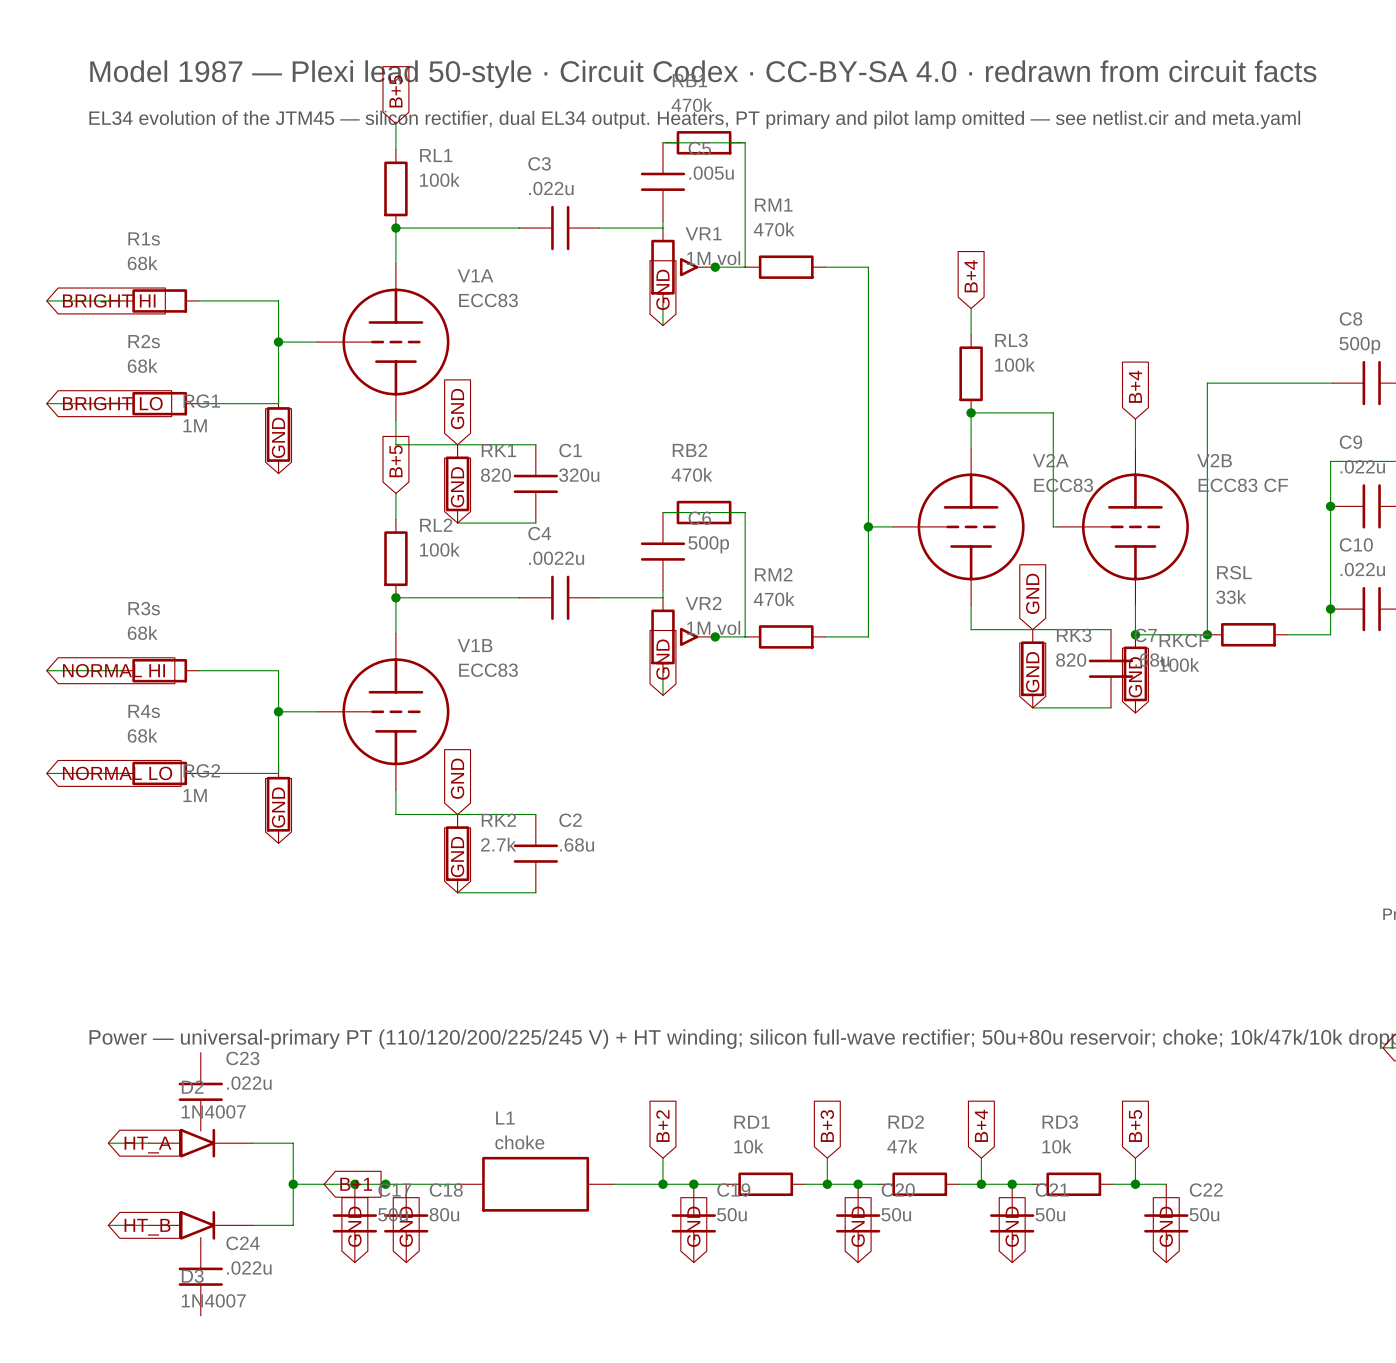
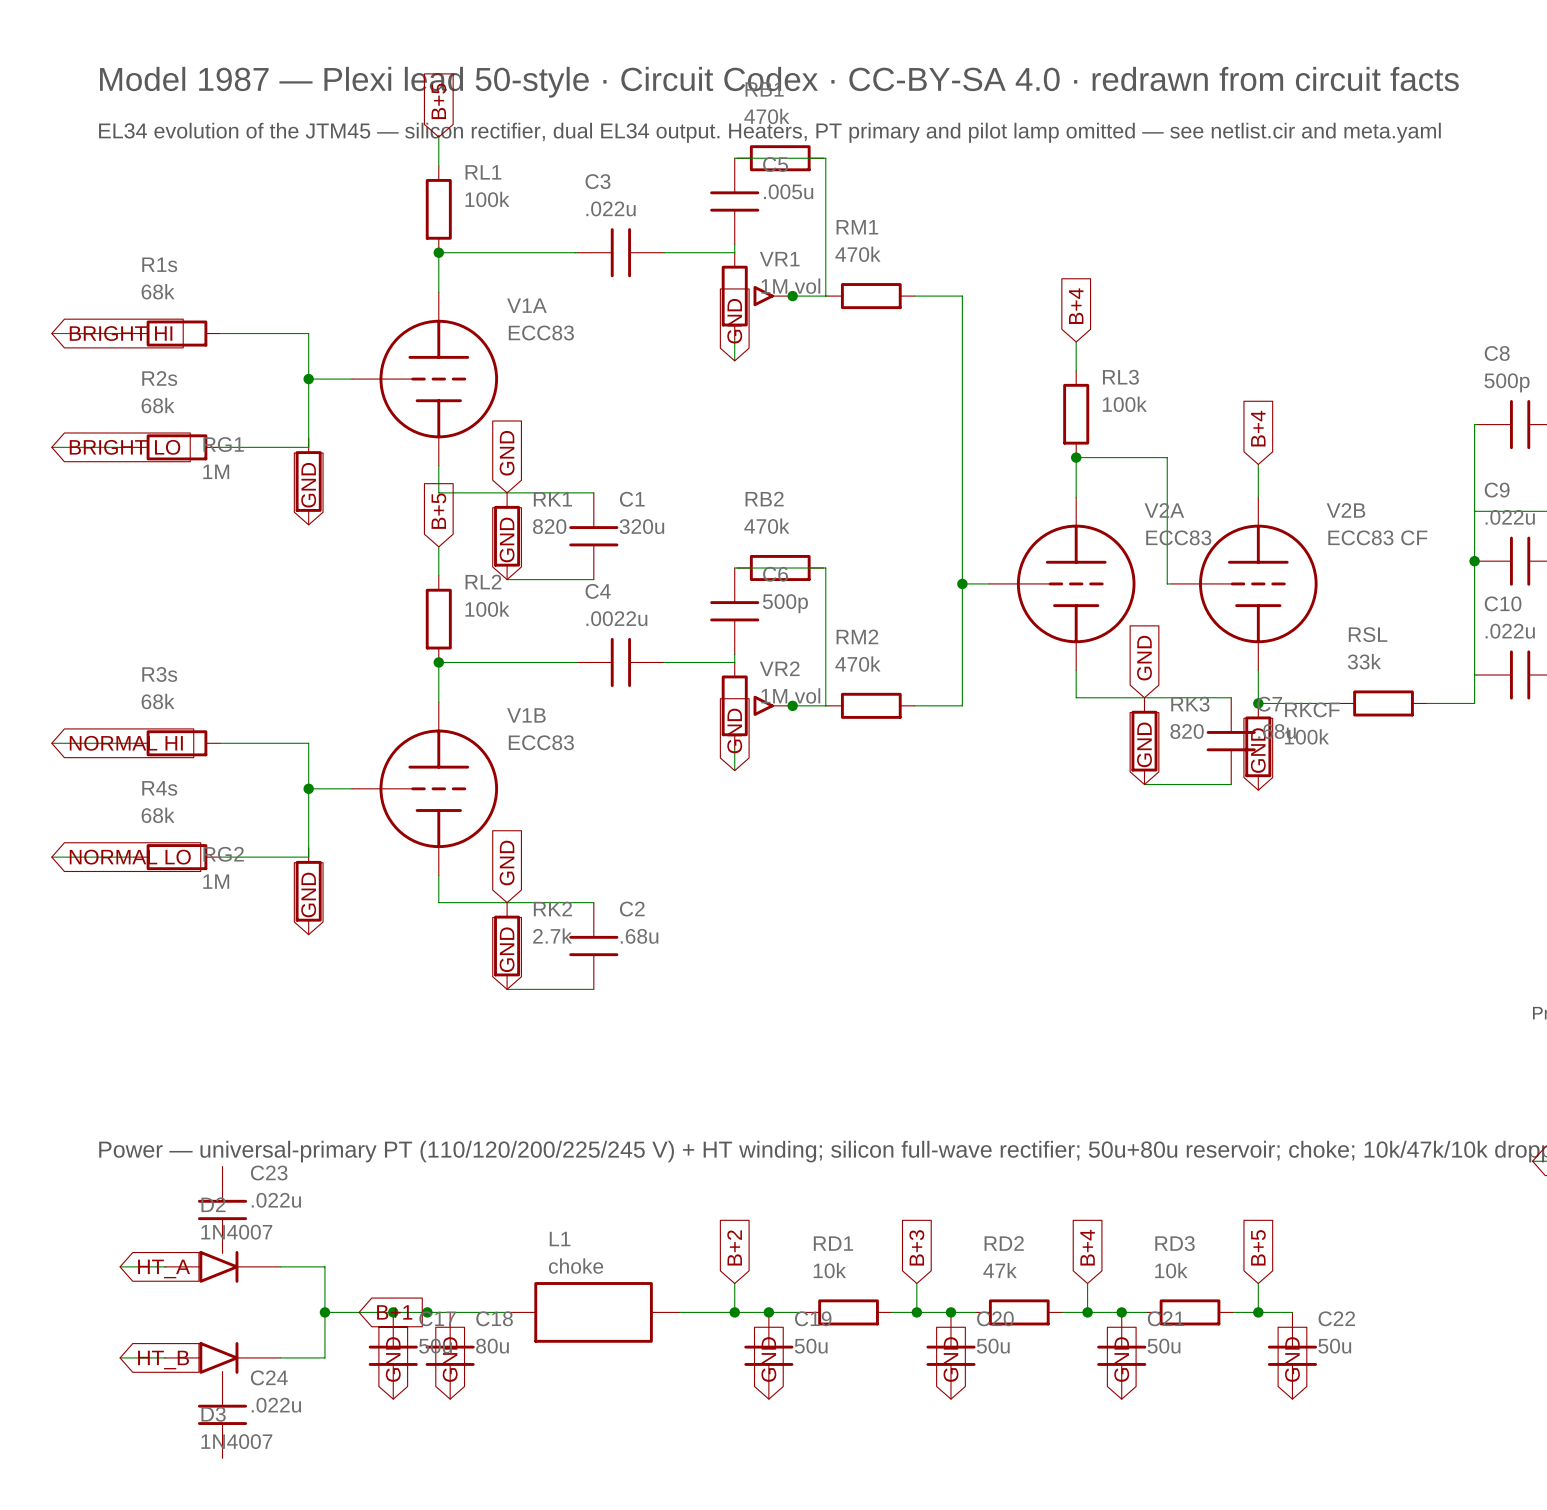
wire: (1330, 383) (1207, 383) (1207, 634) -> (1474, 424) (1474, 511)
junction: (1330, 609) -> none
junction: (1207, 634) -> none

